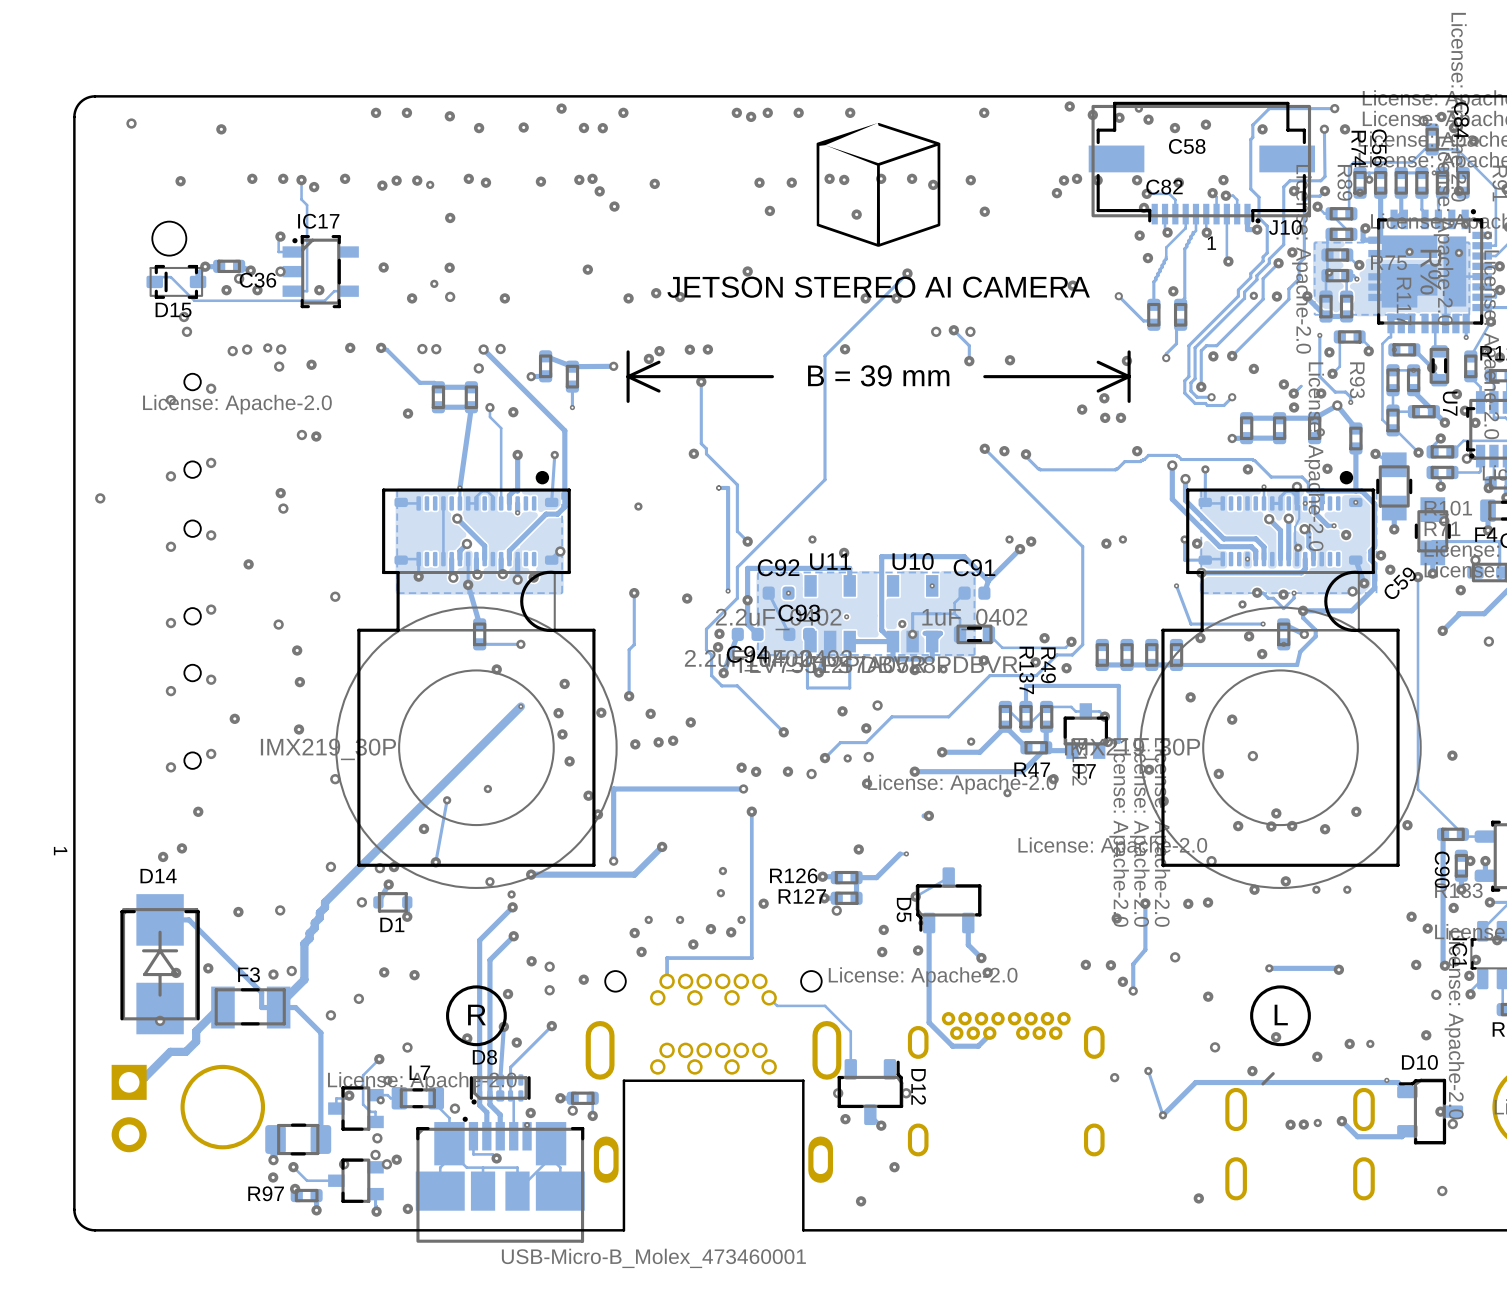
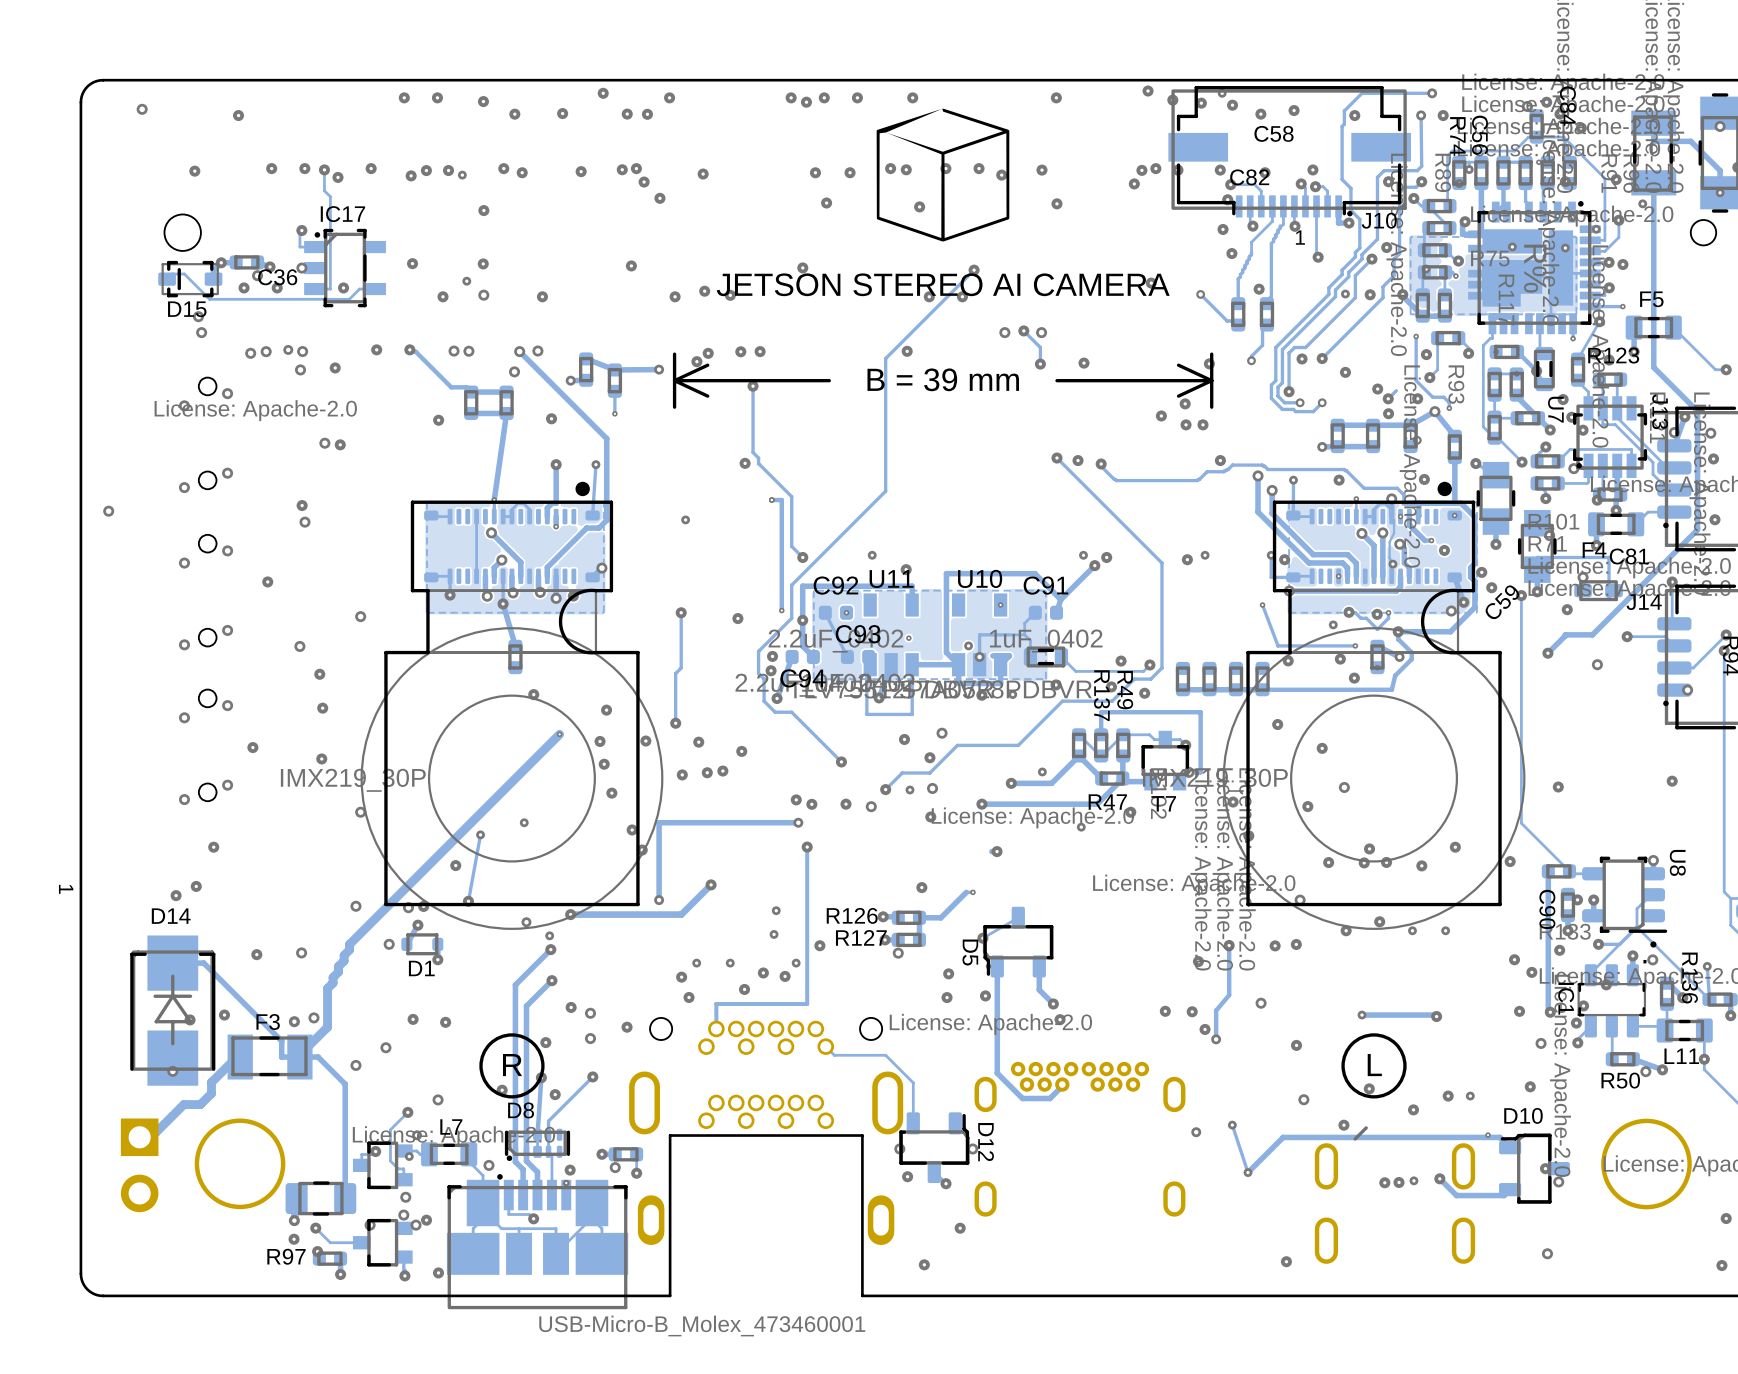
track: (489, 407) (489, 416) (501, 428) (501, 503) -> none
via: (489, 407) -> none
track: (520, 644) (479, 644) -> none
via: (520, 644) -> none

